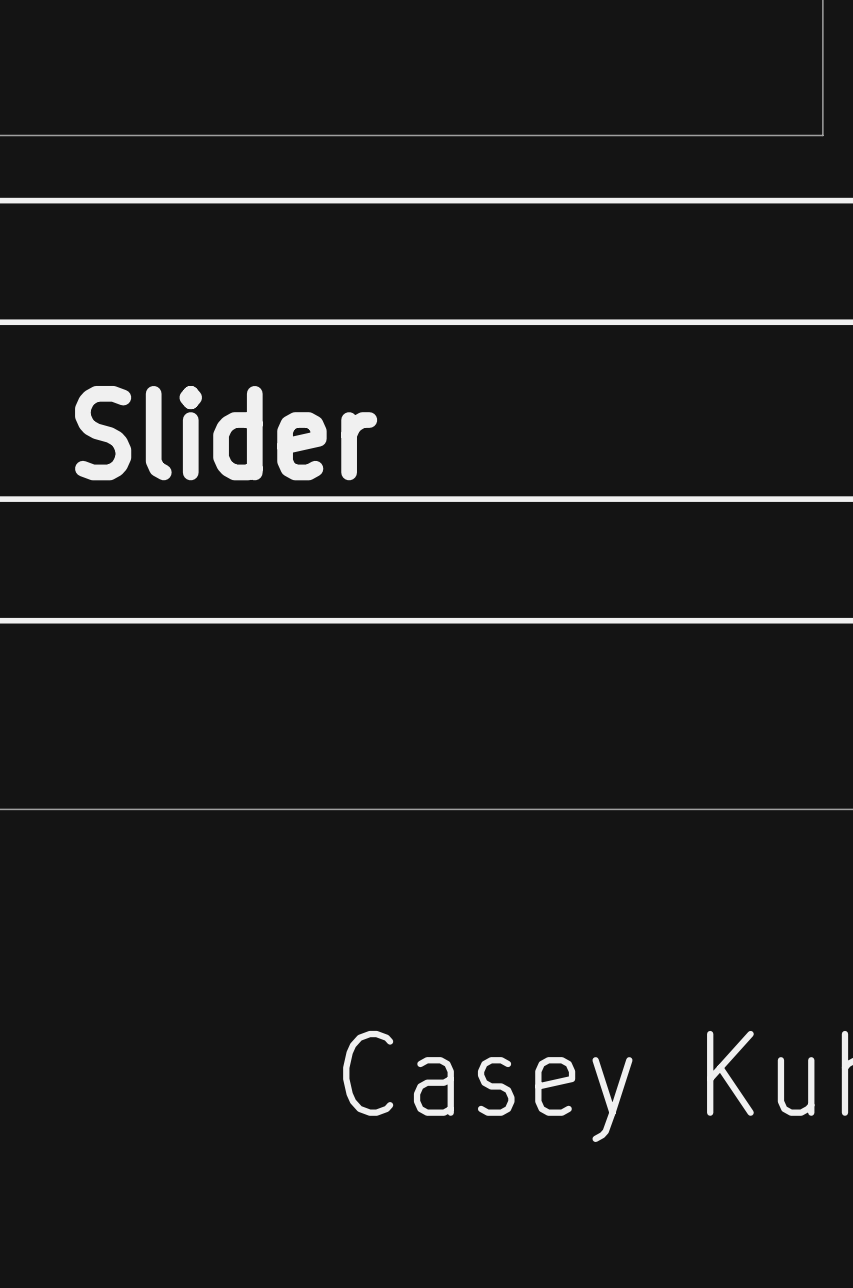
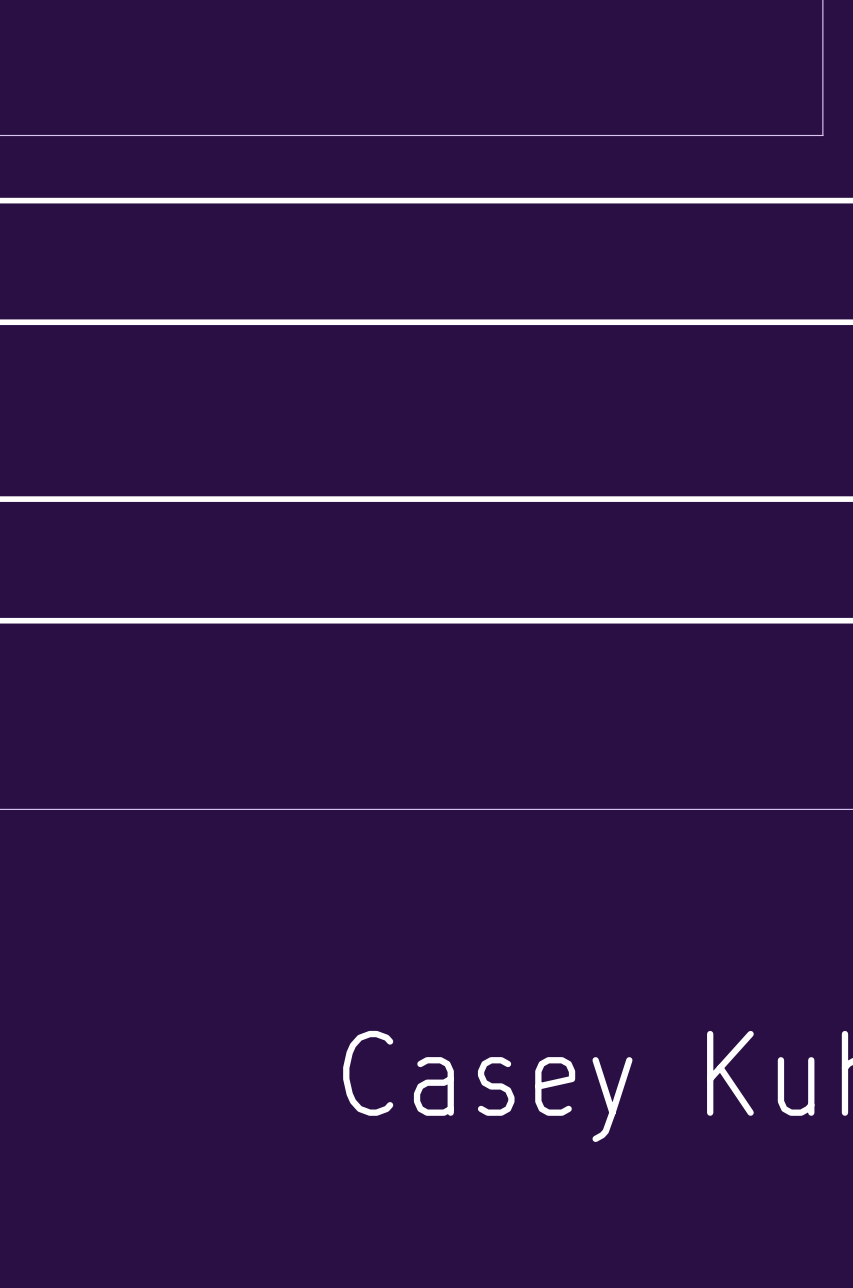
text: Slider (226, 433) -> none

